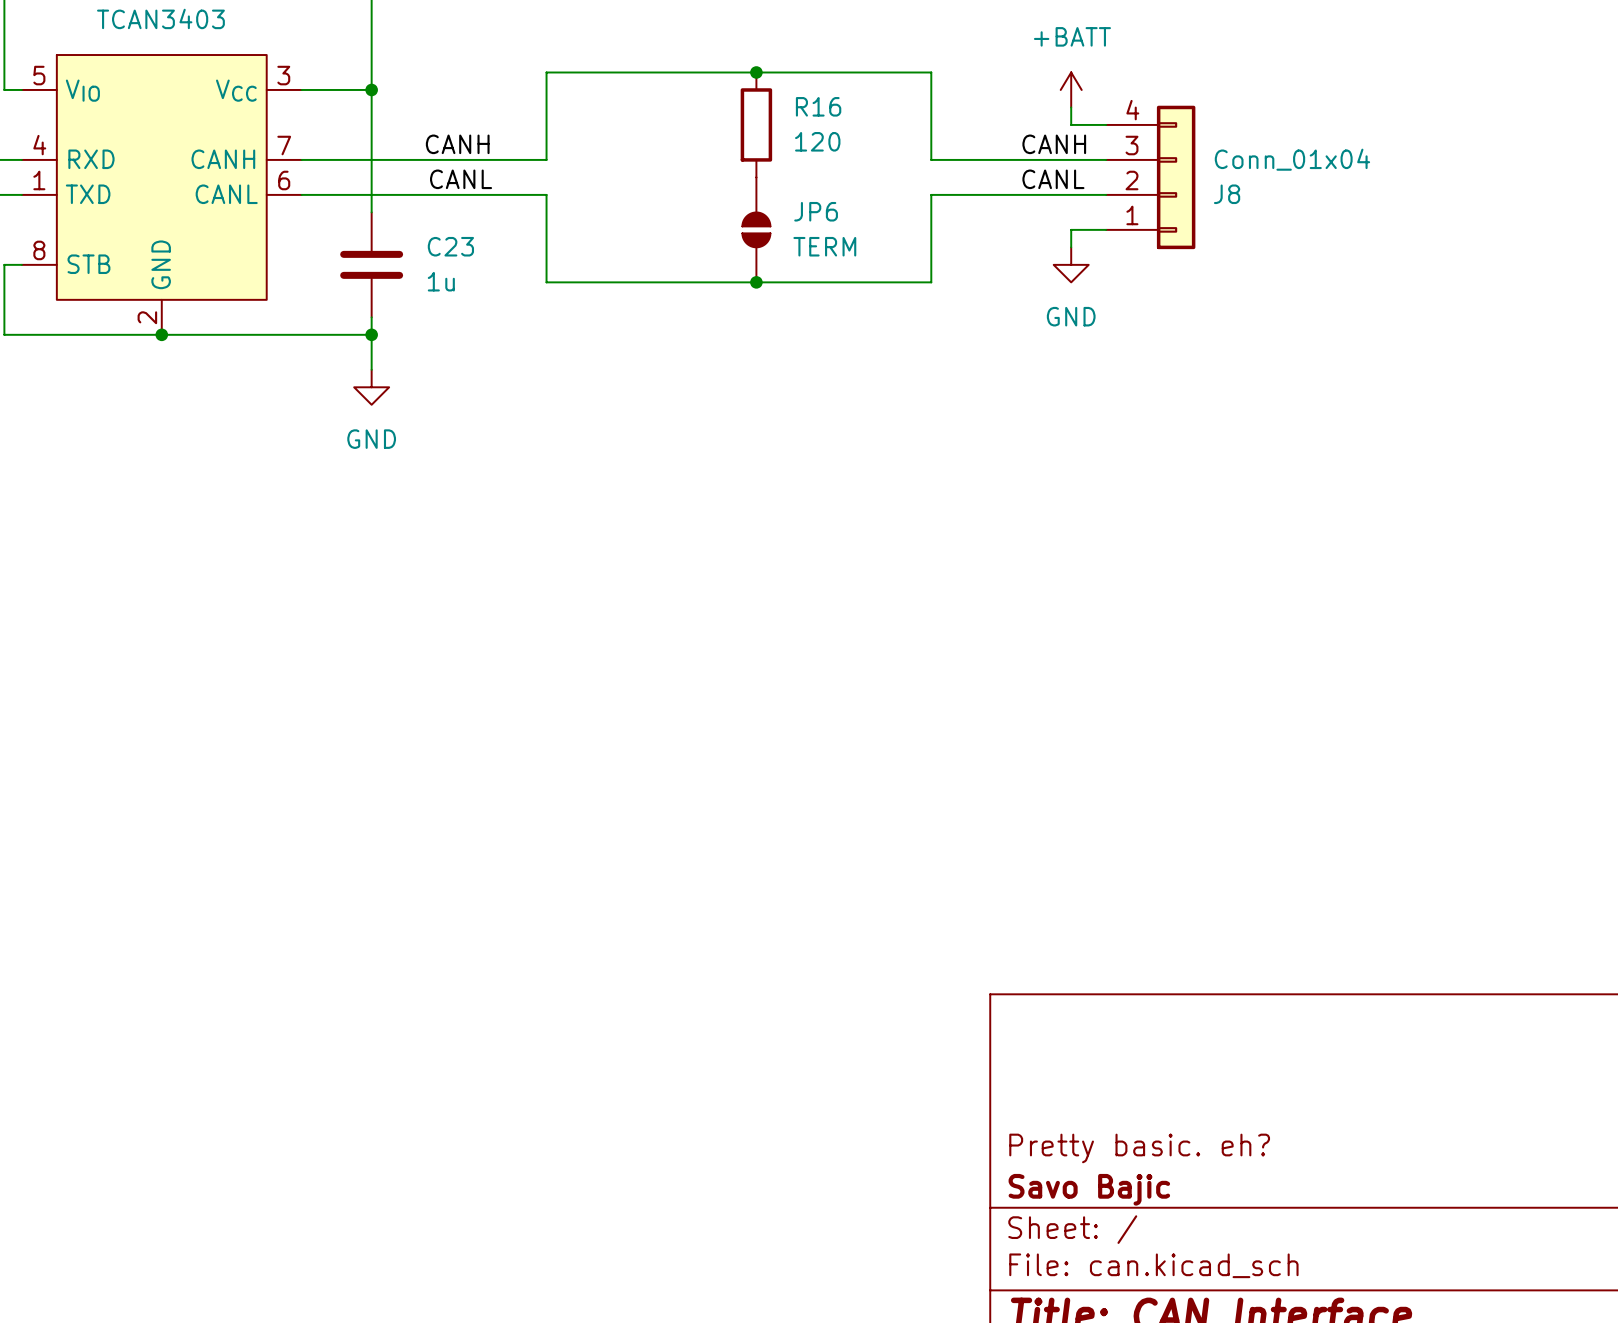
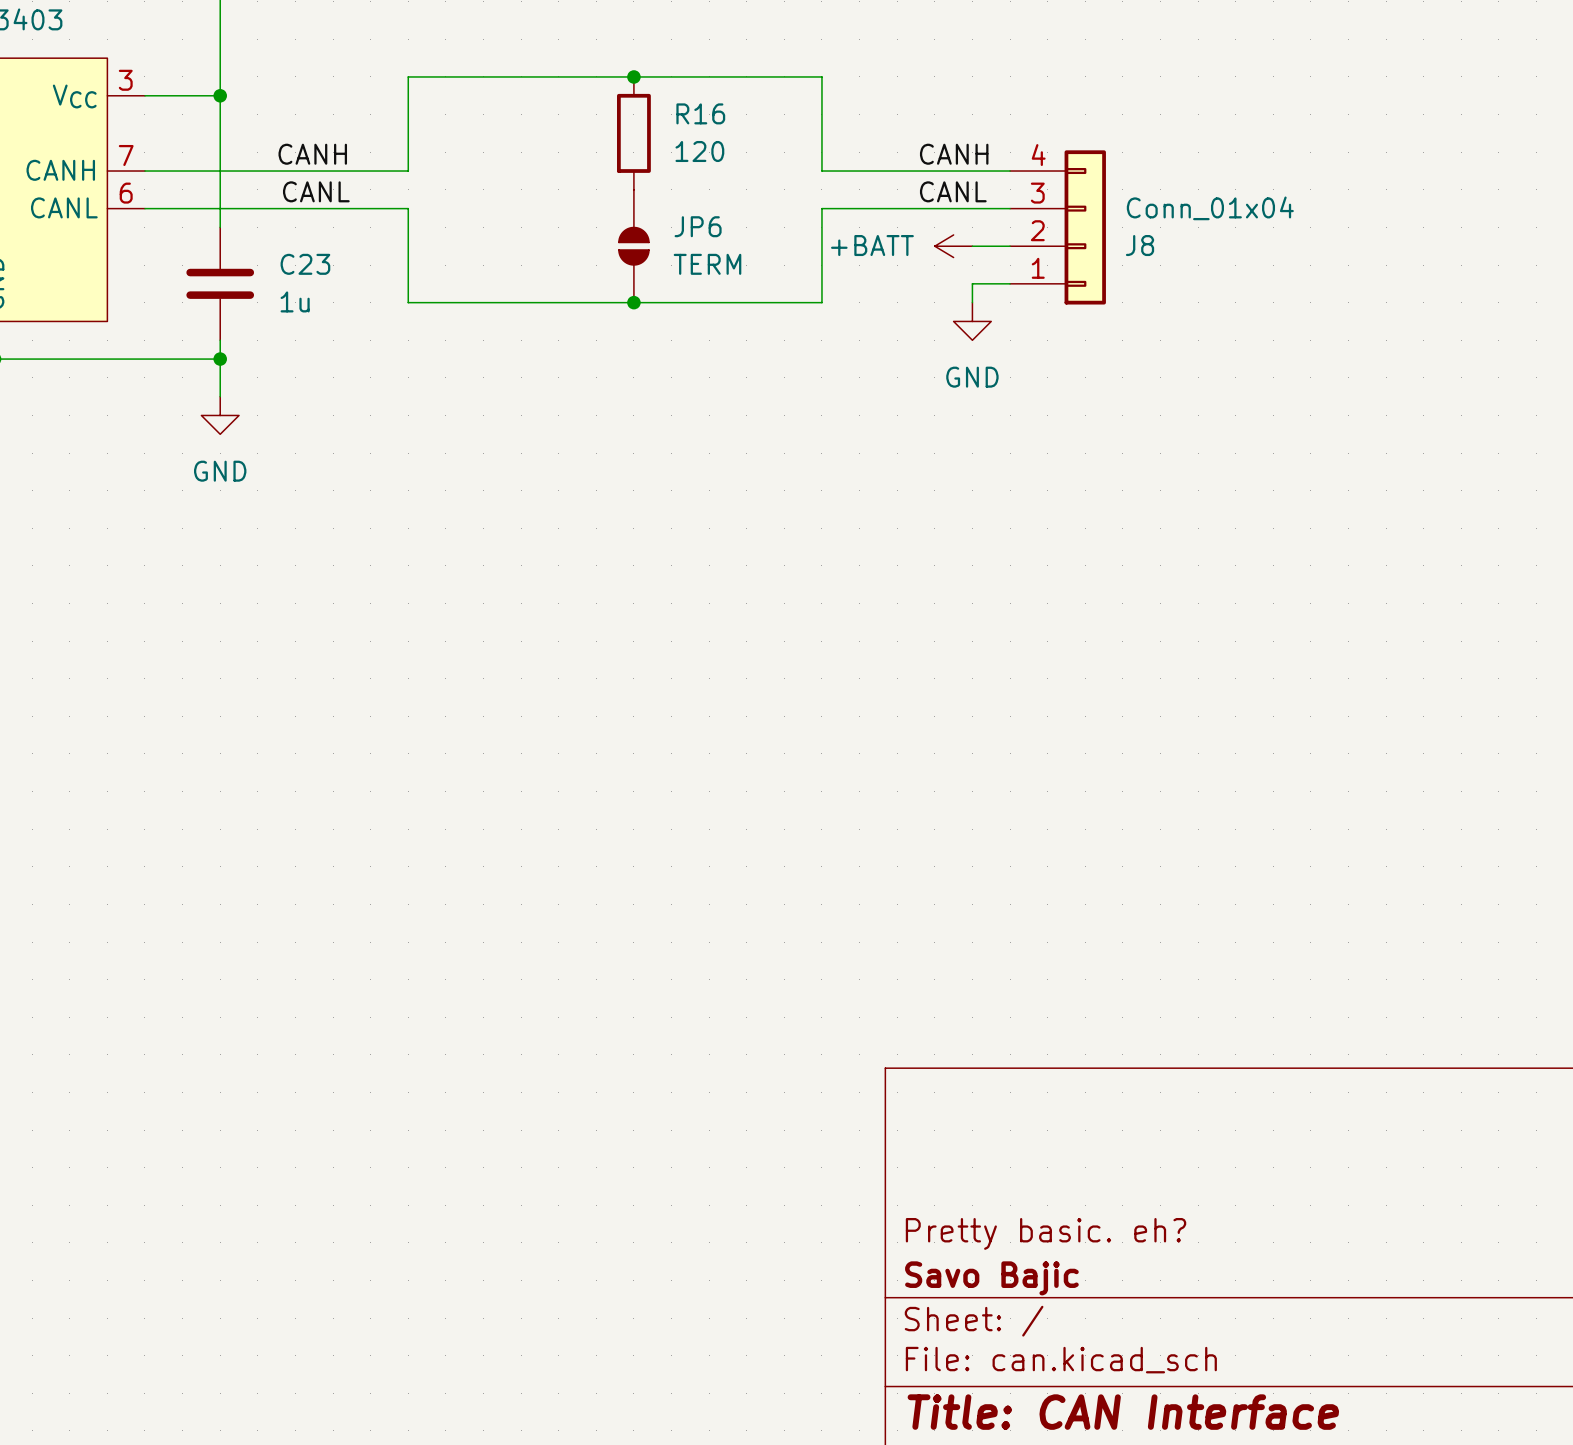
power symbol text position: +BATT (1072, 36) -> +BATT (872, 245)
power symbol rotation: 0° (1071, 89) -> 90° counterclockwise (953, 246)
power symbol position: +BATT (1071, 89) -> +BATT (953, 246)
wire: (1071, 107) (1071, 124) (1106, 124) -> none
J8 position: (1150, 177) -> (1057, 227)
wire: (1071, 229) (1071, 247) -> none
power symbol position: GND (1071, 264) -> GND (972, 321)
wire: none -> (1010, 283) (972, 283) (972, 302)

